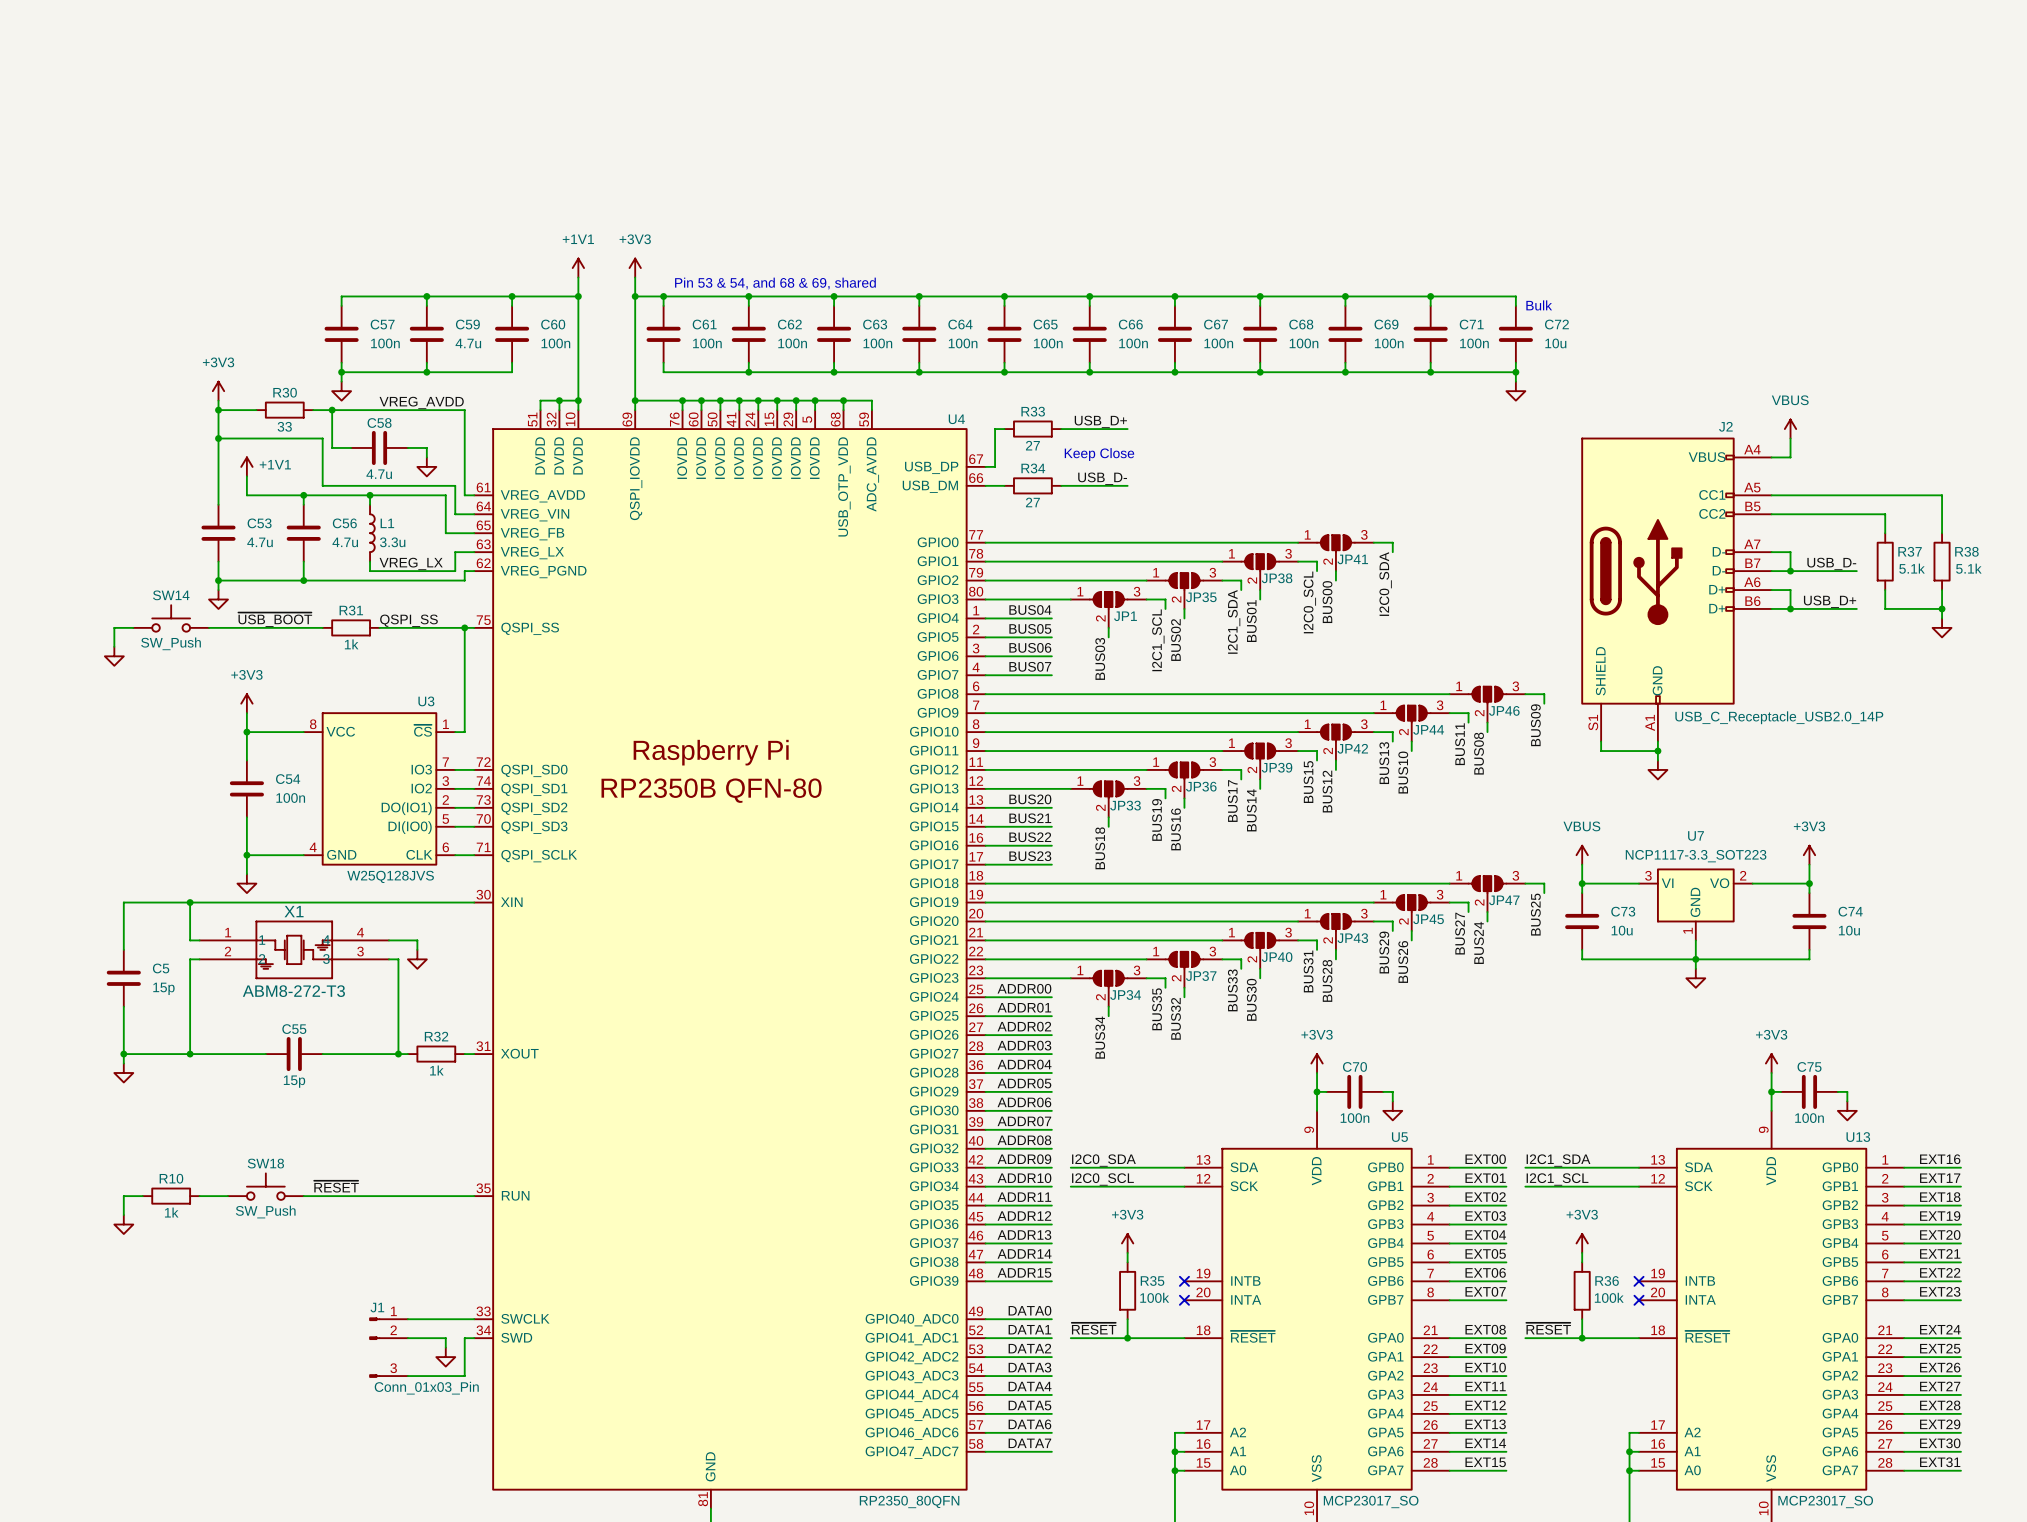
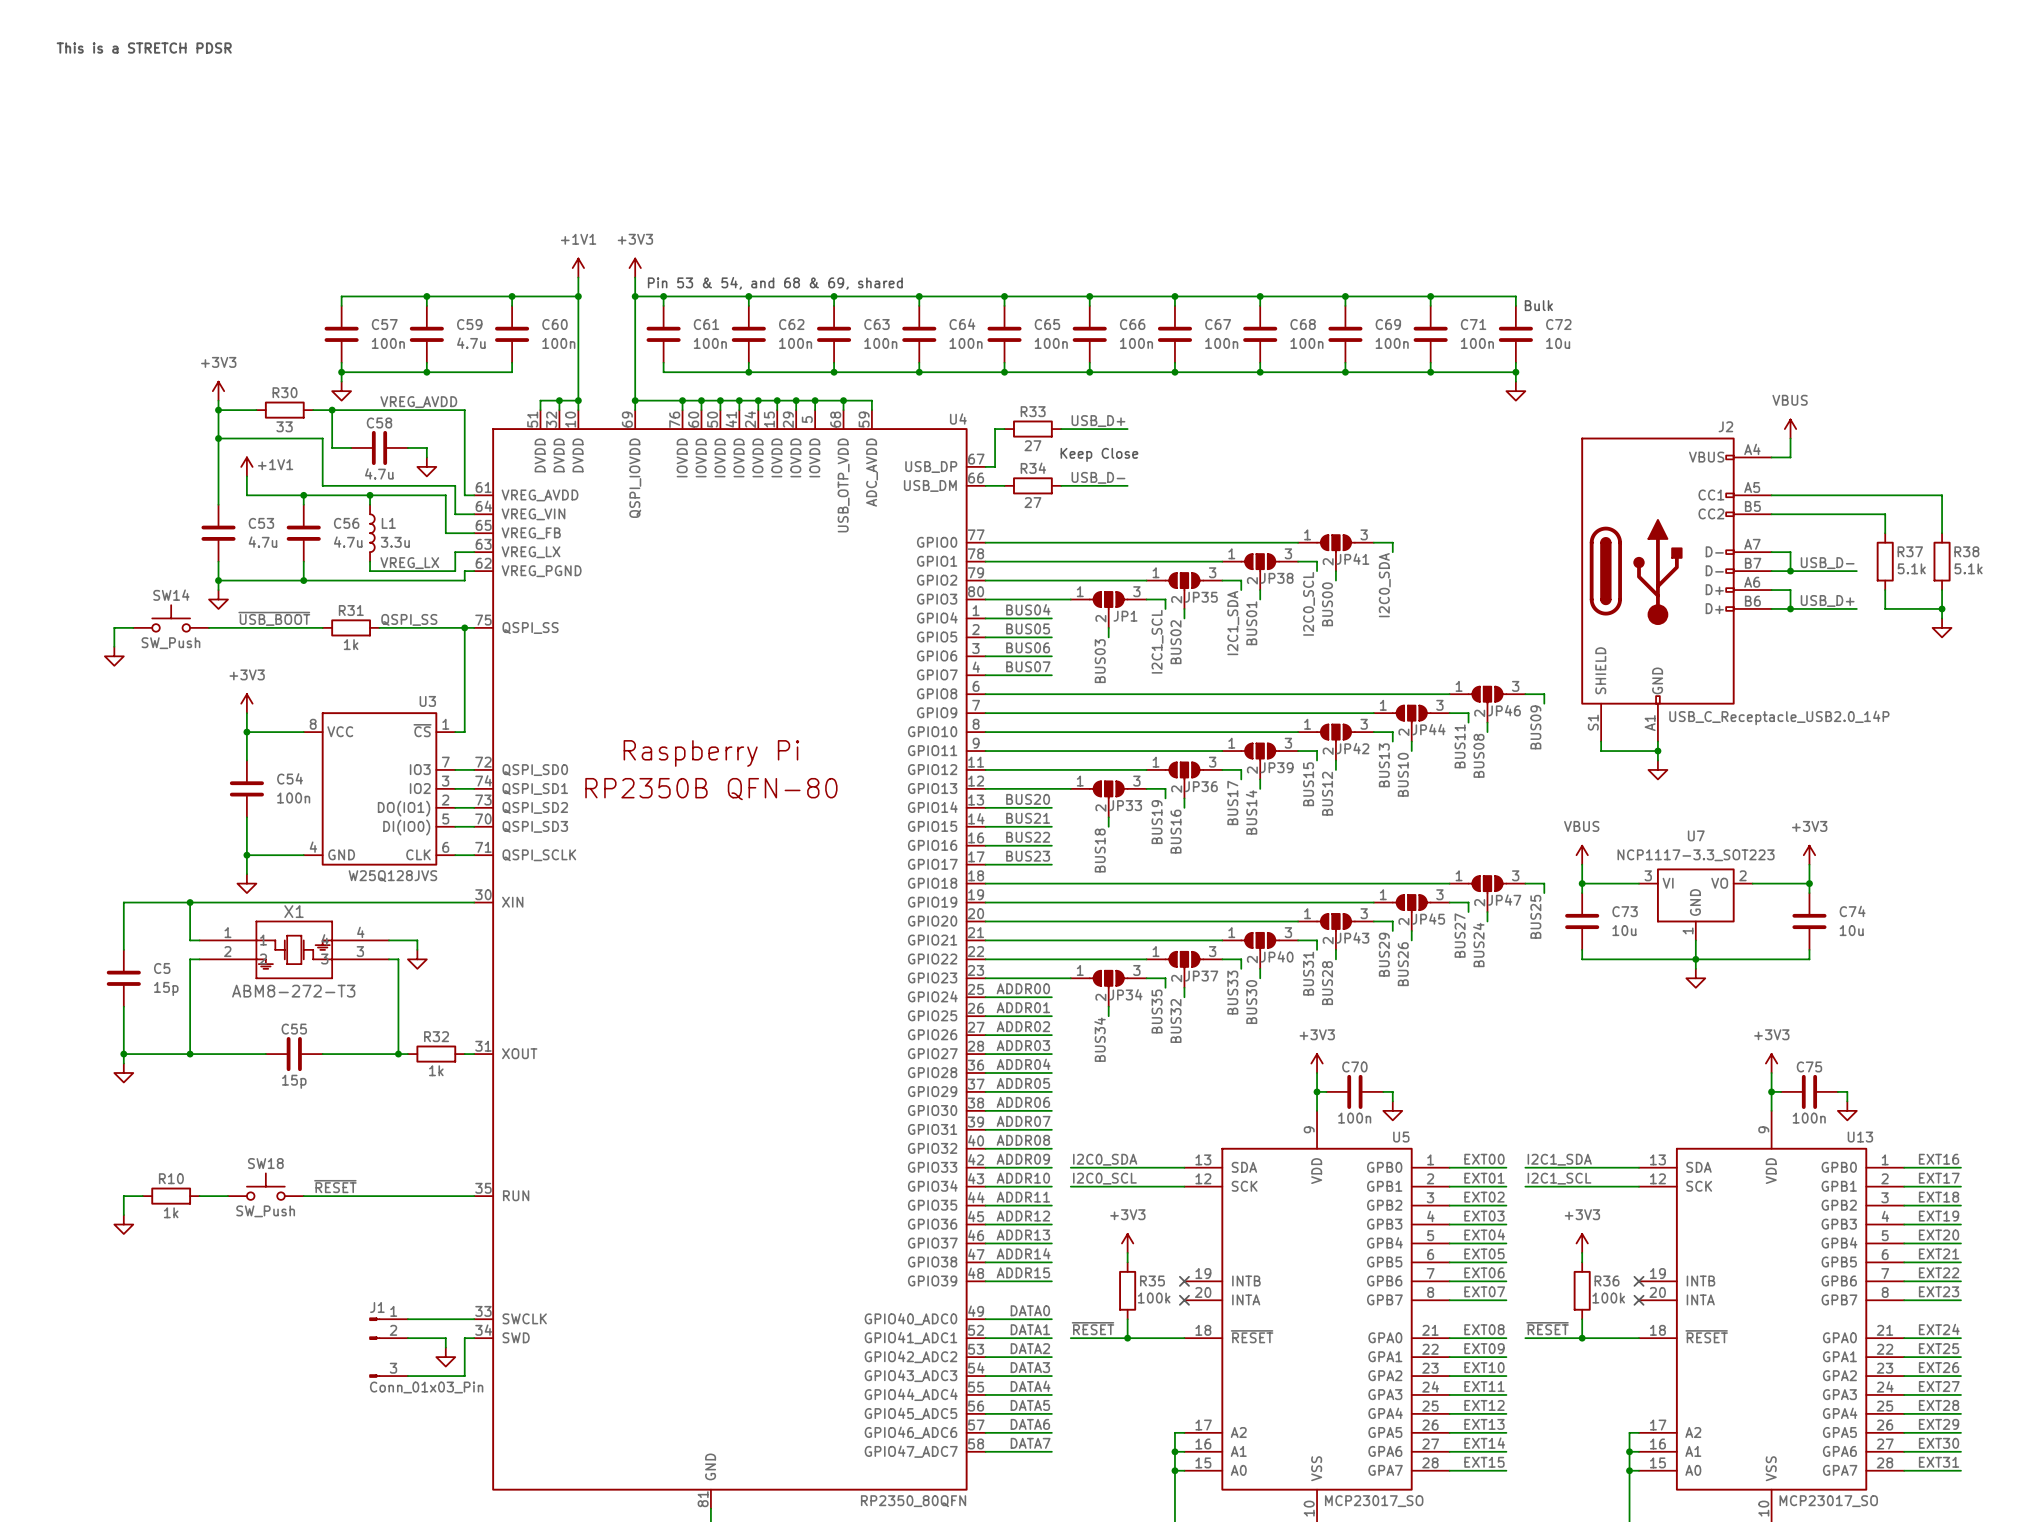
text: none -> This is a STRETCH PDSR (144, 48)

